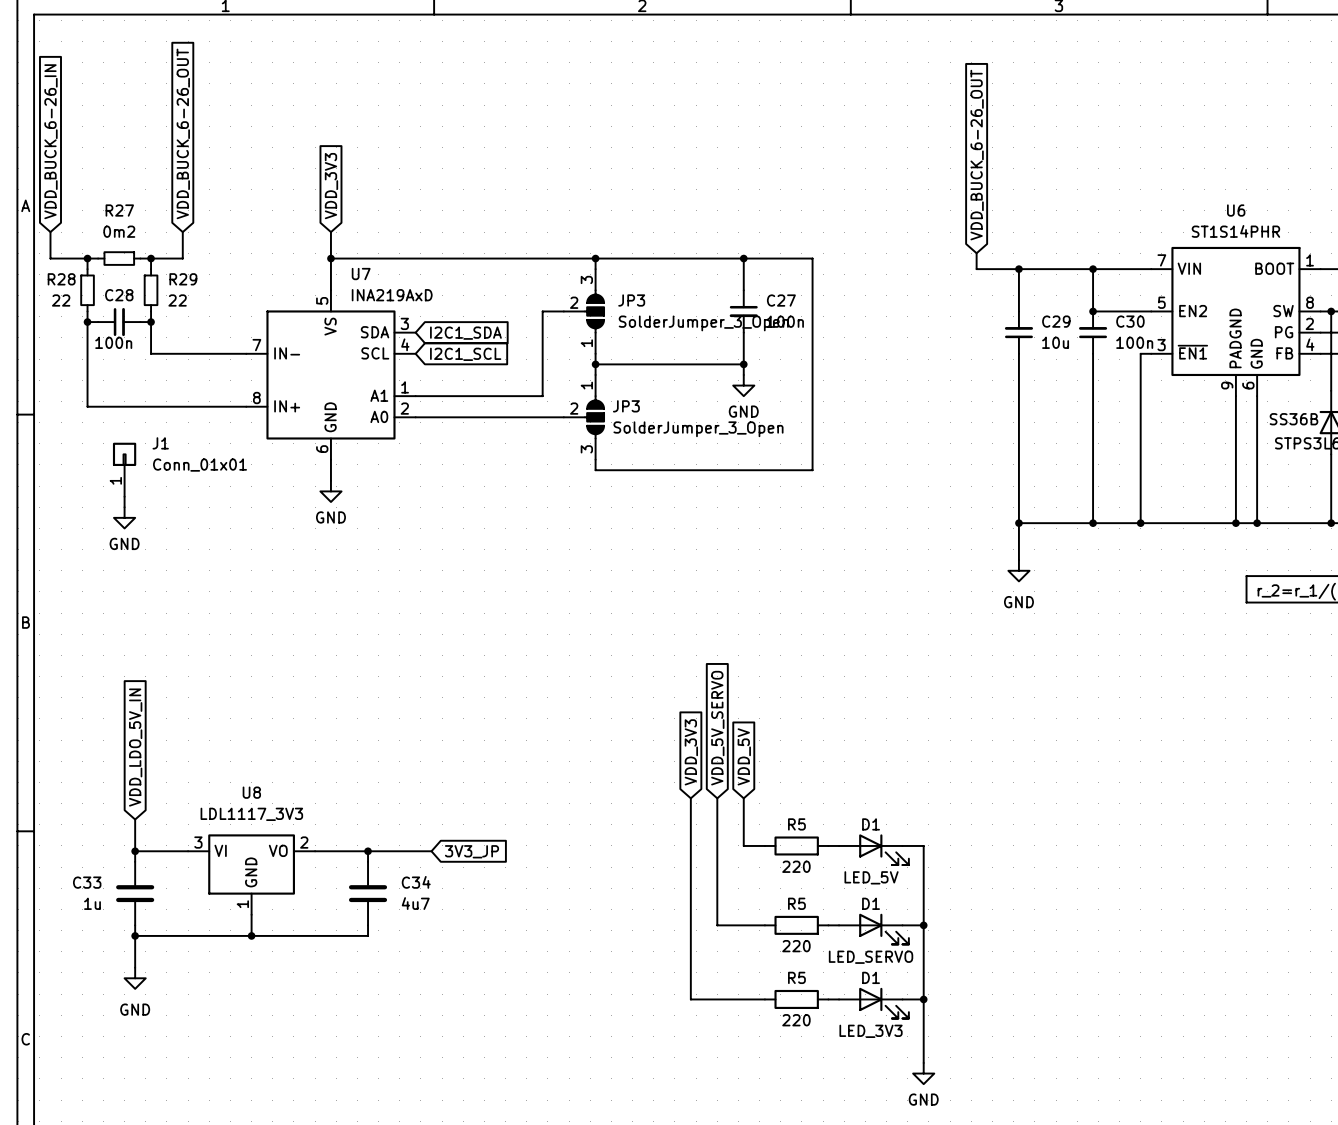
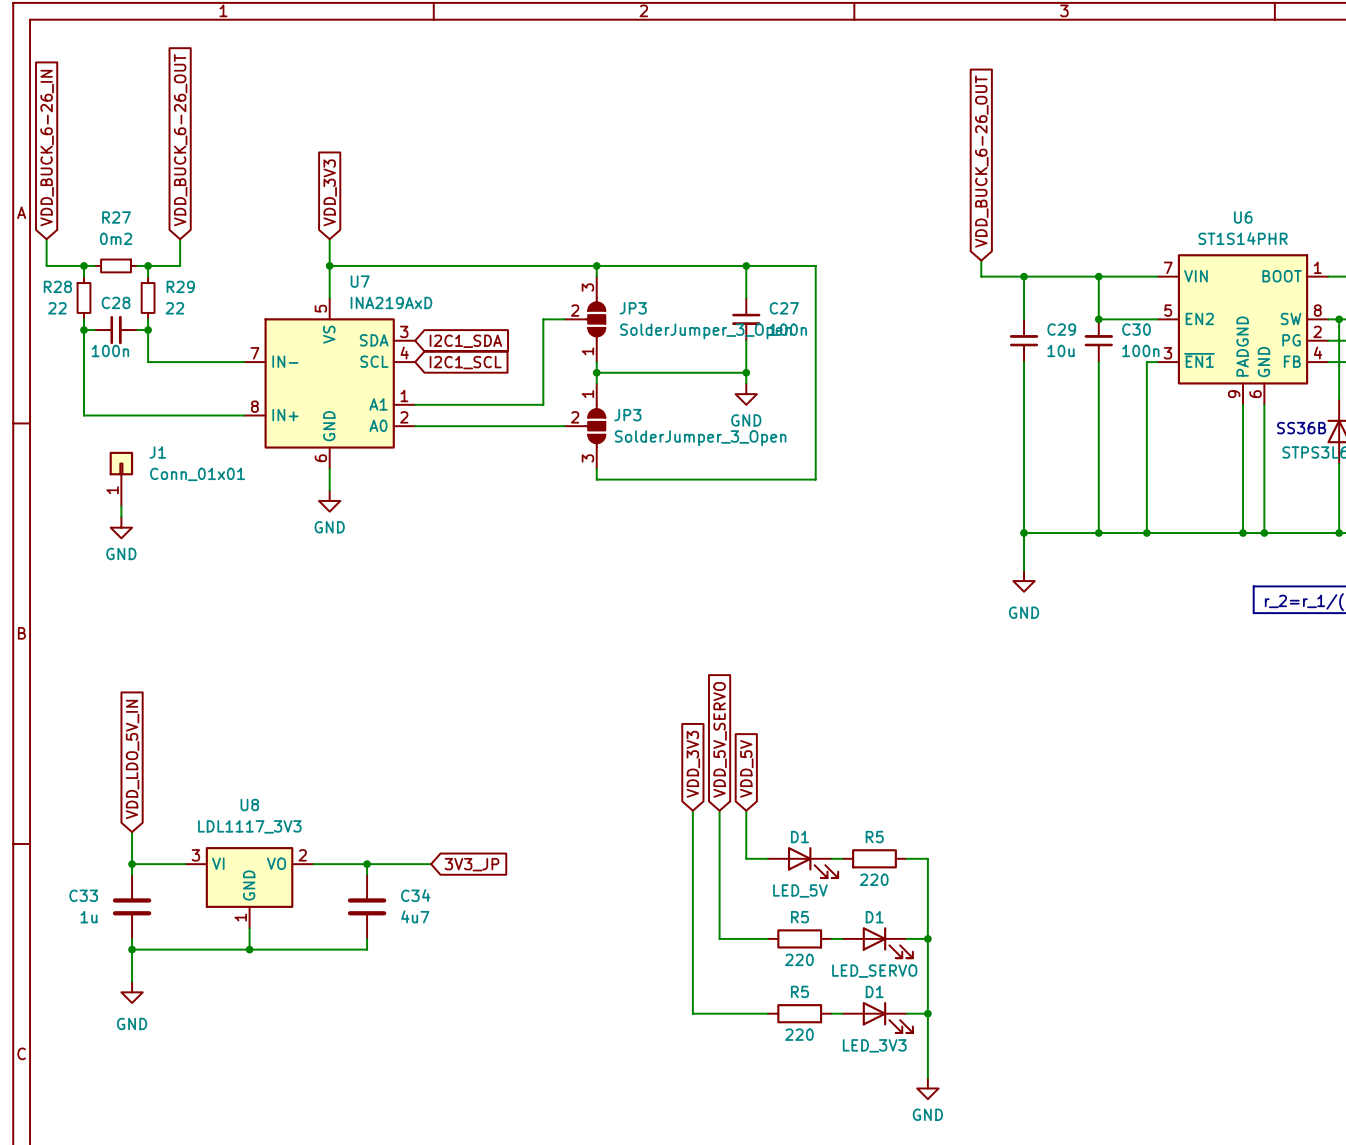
R5 position: (796, 845) -> (874, 858)
D1 position: (873, 849) -> (802, 862)

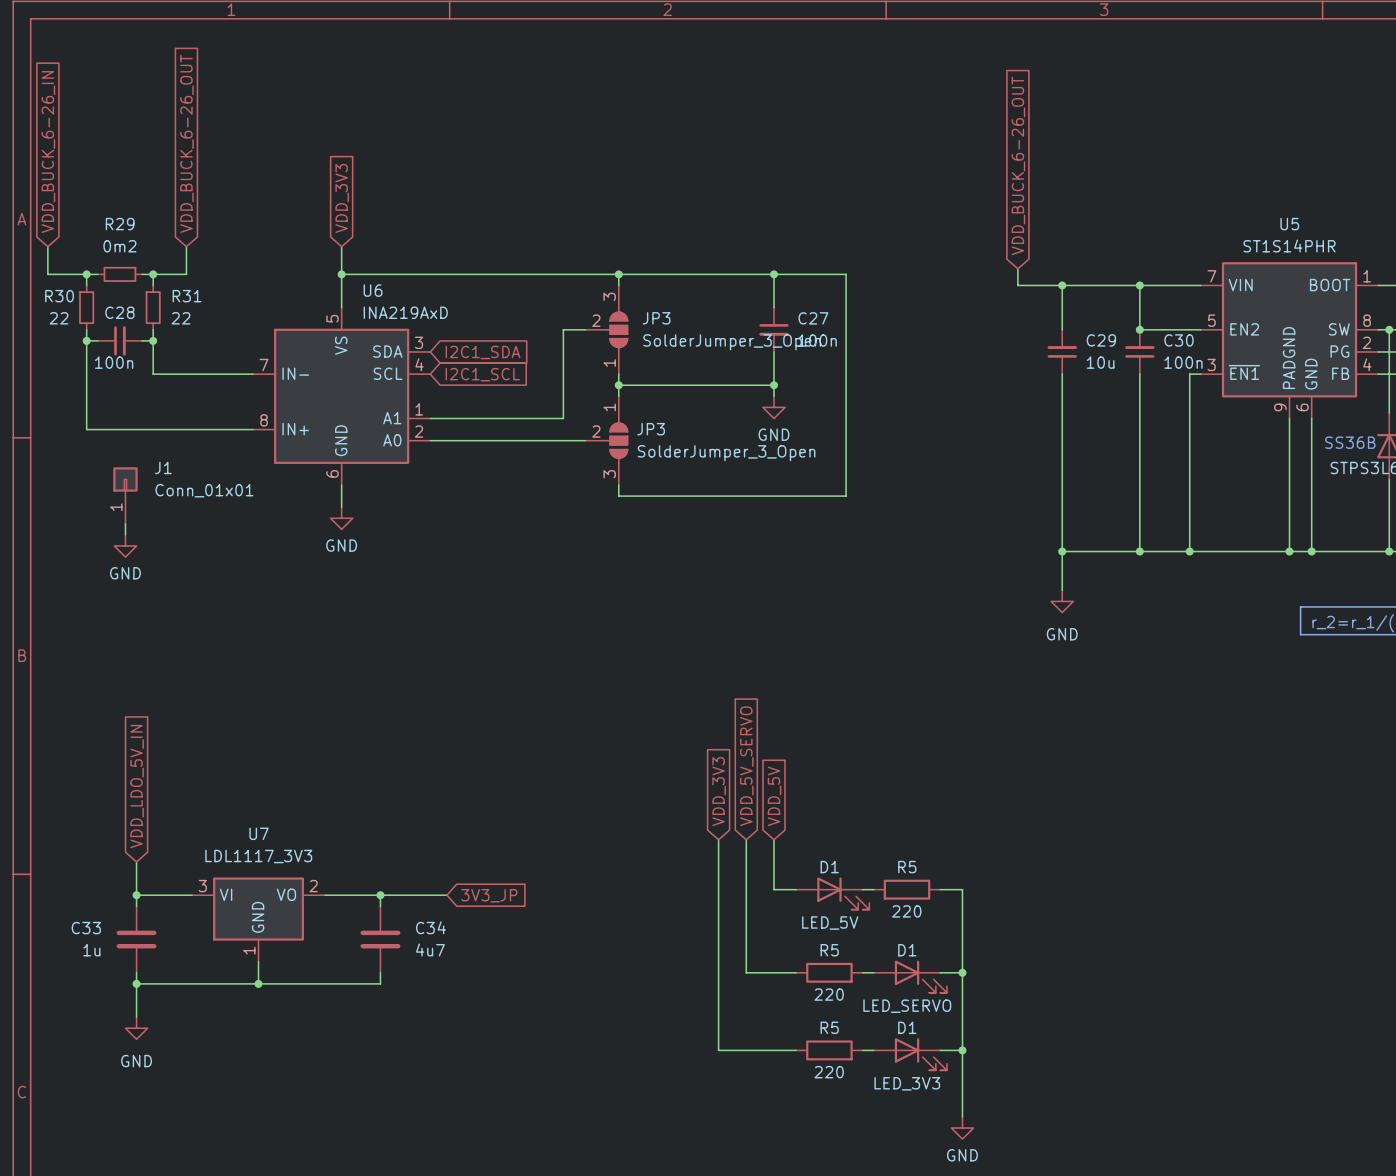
R27 name: R27 (116, 217) -> R29 (120, 224)
U6 name: U6 (1243, 217) -> U5 (1289, 224)
U7 name: U7 (360, 281) -> U6 (373, 290)
R28 name: R28 (57, 286) -> R30 (59, 296)
R29 name: R29 (180, 286) -> R31 (187, 296)
U8 name: U8 (249, 805) -> U7 (259, 833)

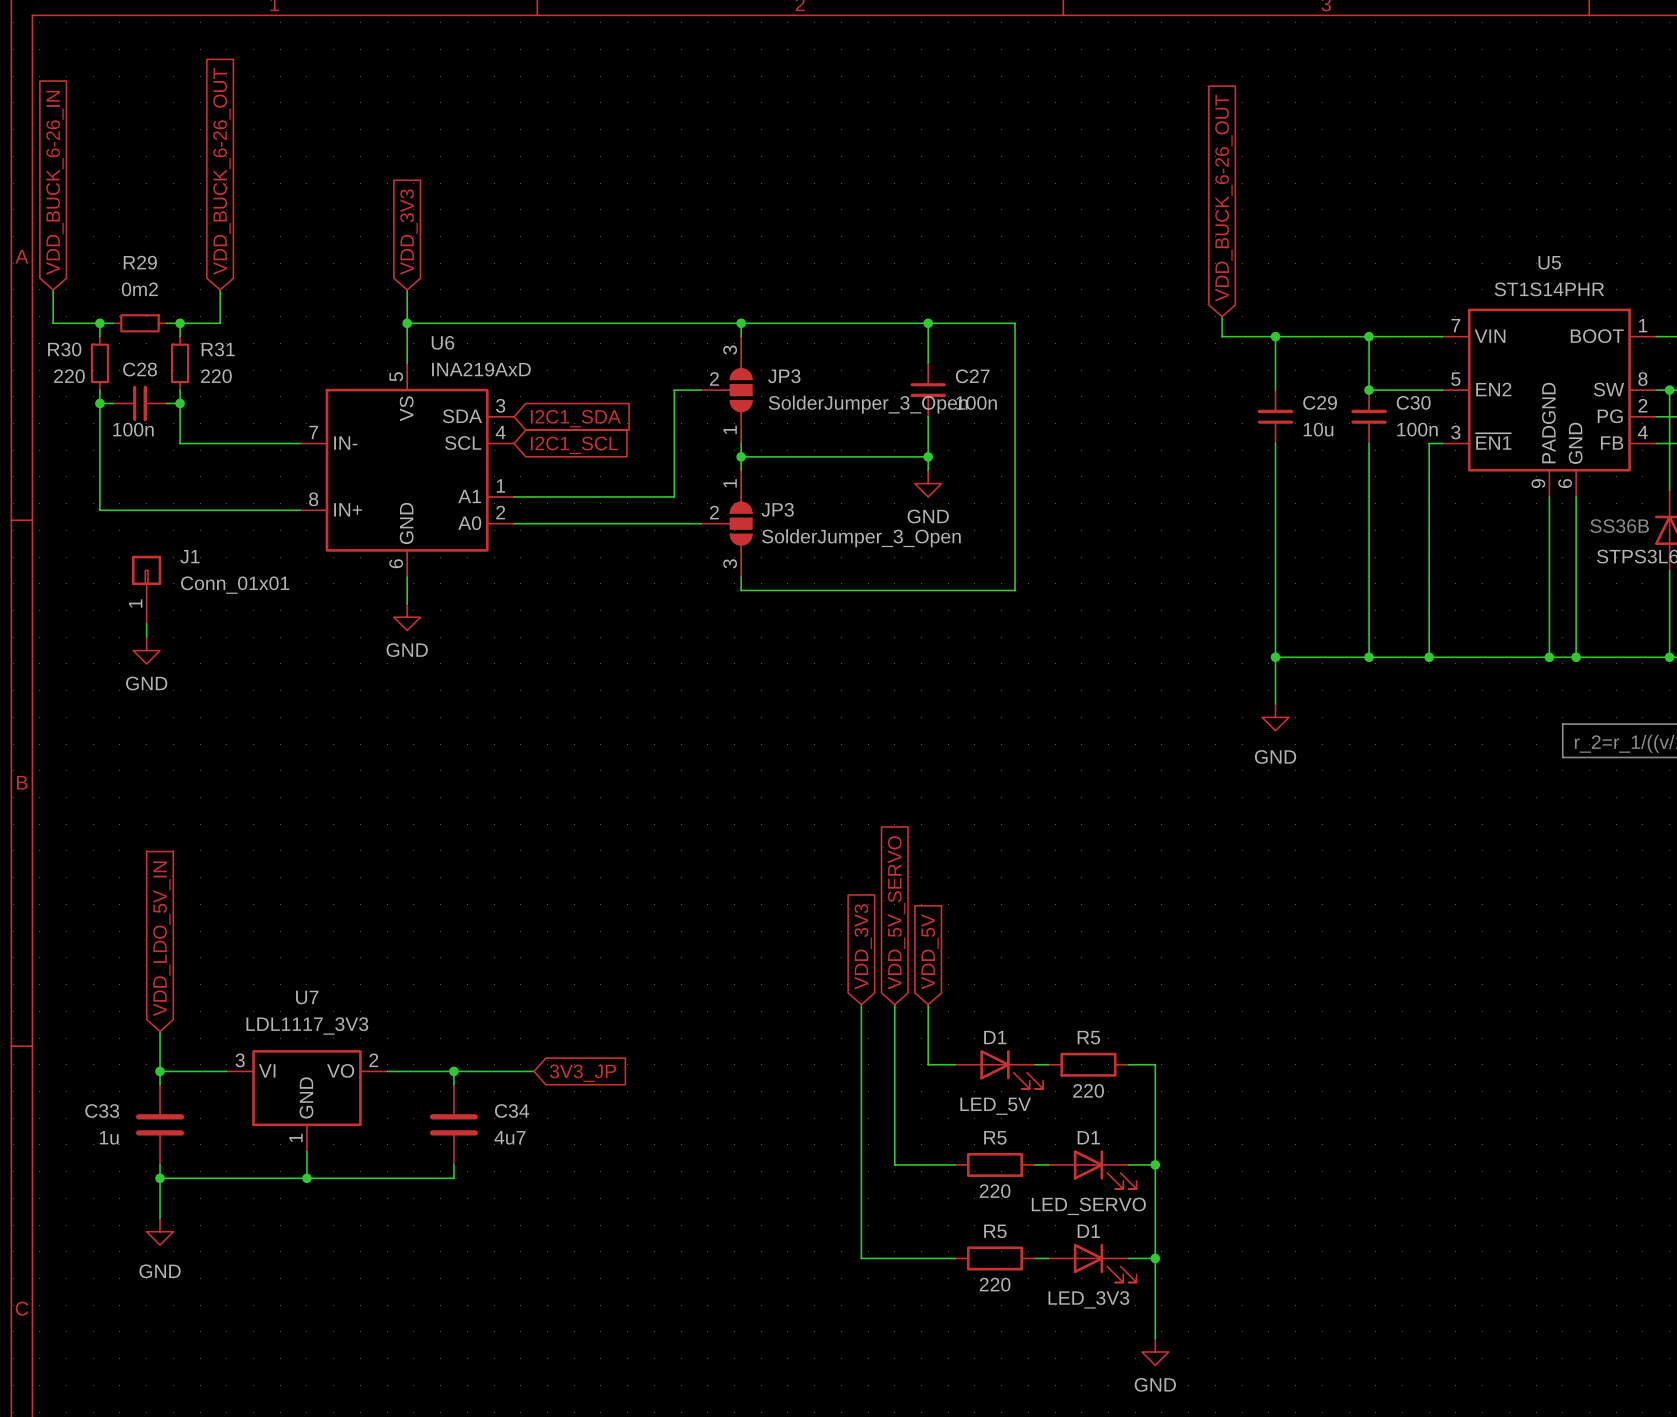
R30 value: 22 (59, 318) -> 220 (69, 376)
R31 value: 22 (180, 318) -> 220 (216, 376)

